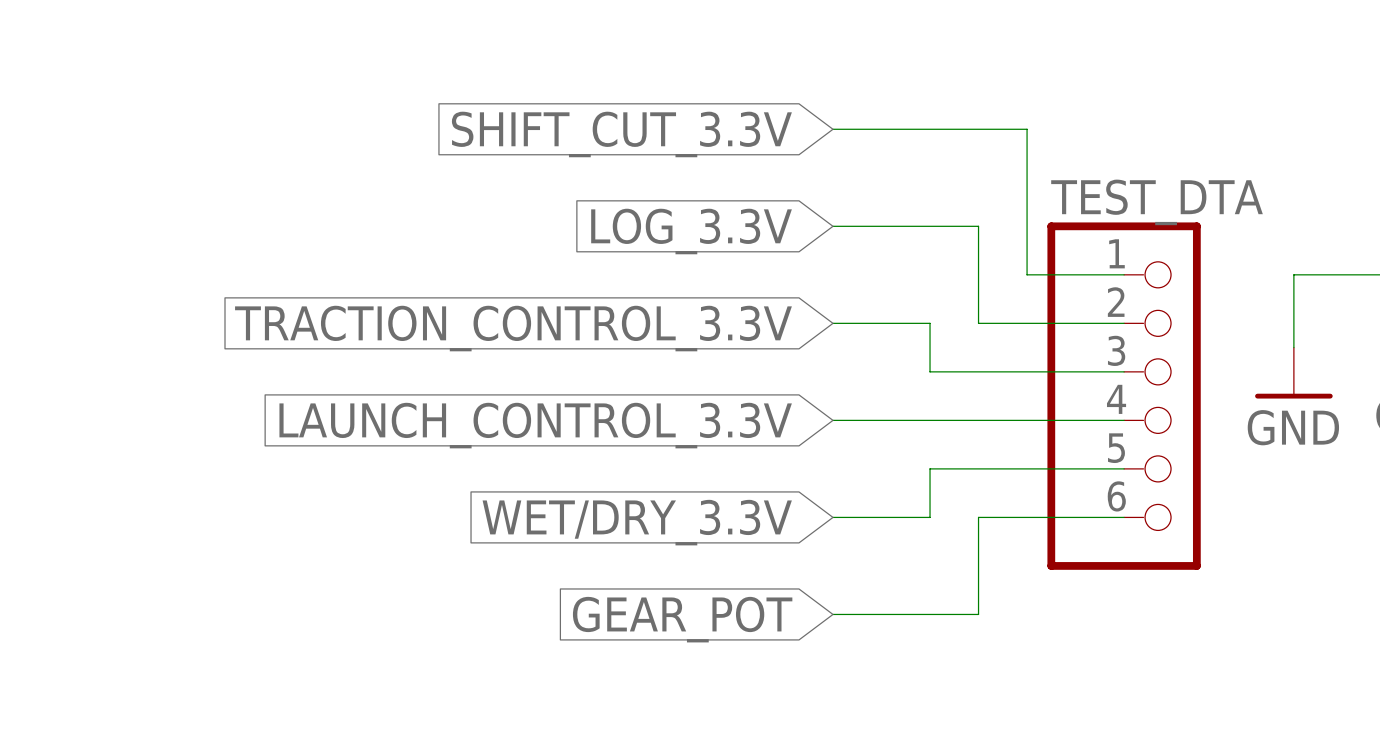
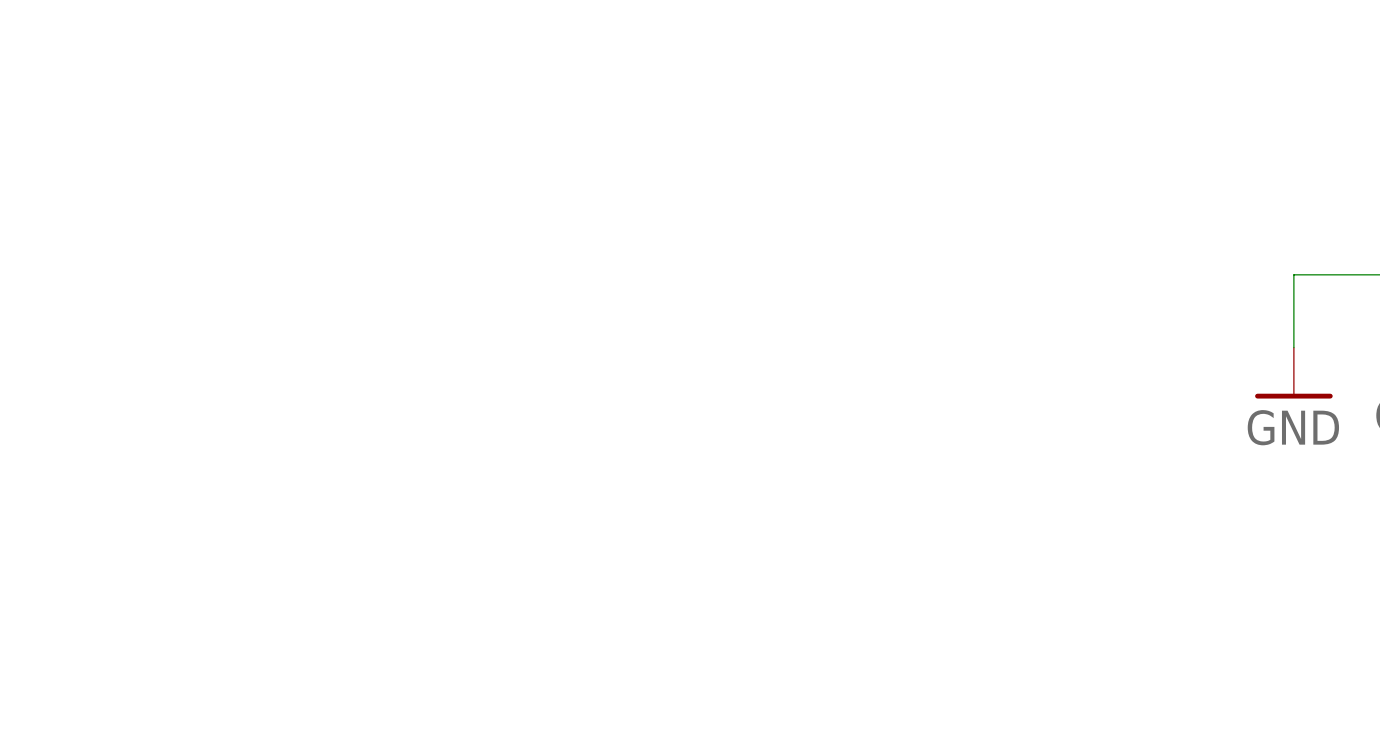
wire: (832, 129) (1027, 129) (1027, 274) (1124, 274) -> none
global label: SHIFT_CUT_3.3V (621, 134) -> none
wire: (832, 226) (978, 226) (978, 323) (1124, 323) -> none
global label: LOG_3.3V (691, 231) -> none
wire: (832, 323) (930, 323) (930, 371) (1124, 371) -> none
global label: TRACTION_CONTROL_3.3V (513, 328) -> none
TEST_DTA: (1124, 396) -> none
wire: (832, 420) (1124, 420) -> none
global label: LAUNCH_CONTROL_3.3V (535, 425) -> none
wire: (1124, 468) (930, 468) (930, 517) (832, 517) -> none
wire: (1124, 517) (978, 517) (978, 614) (832, 614) -> none
global label: WET/DRY_3.3V (637, 522) -> none
global label: GEAR_POT (682, 619) -> none

